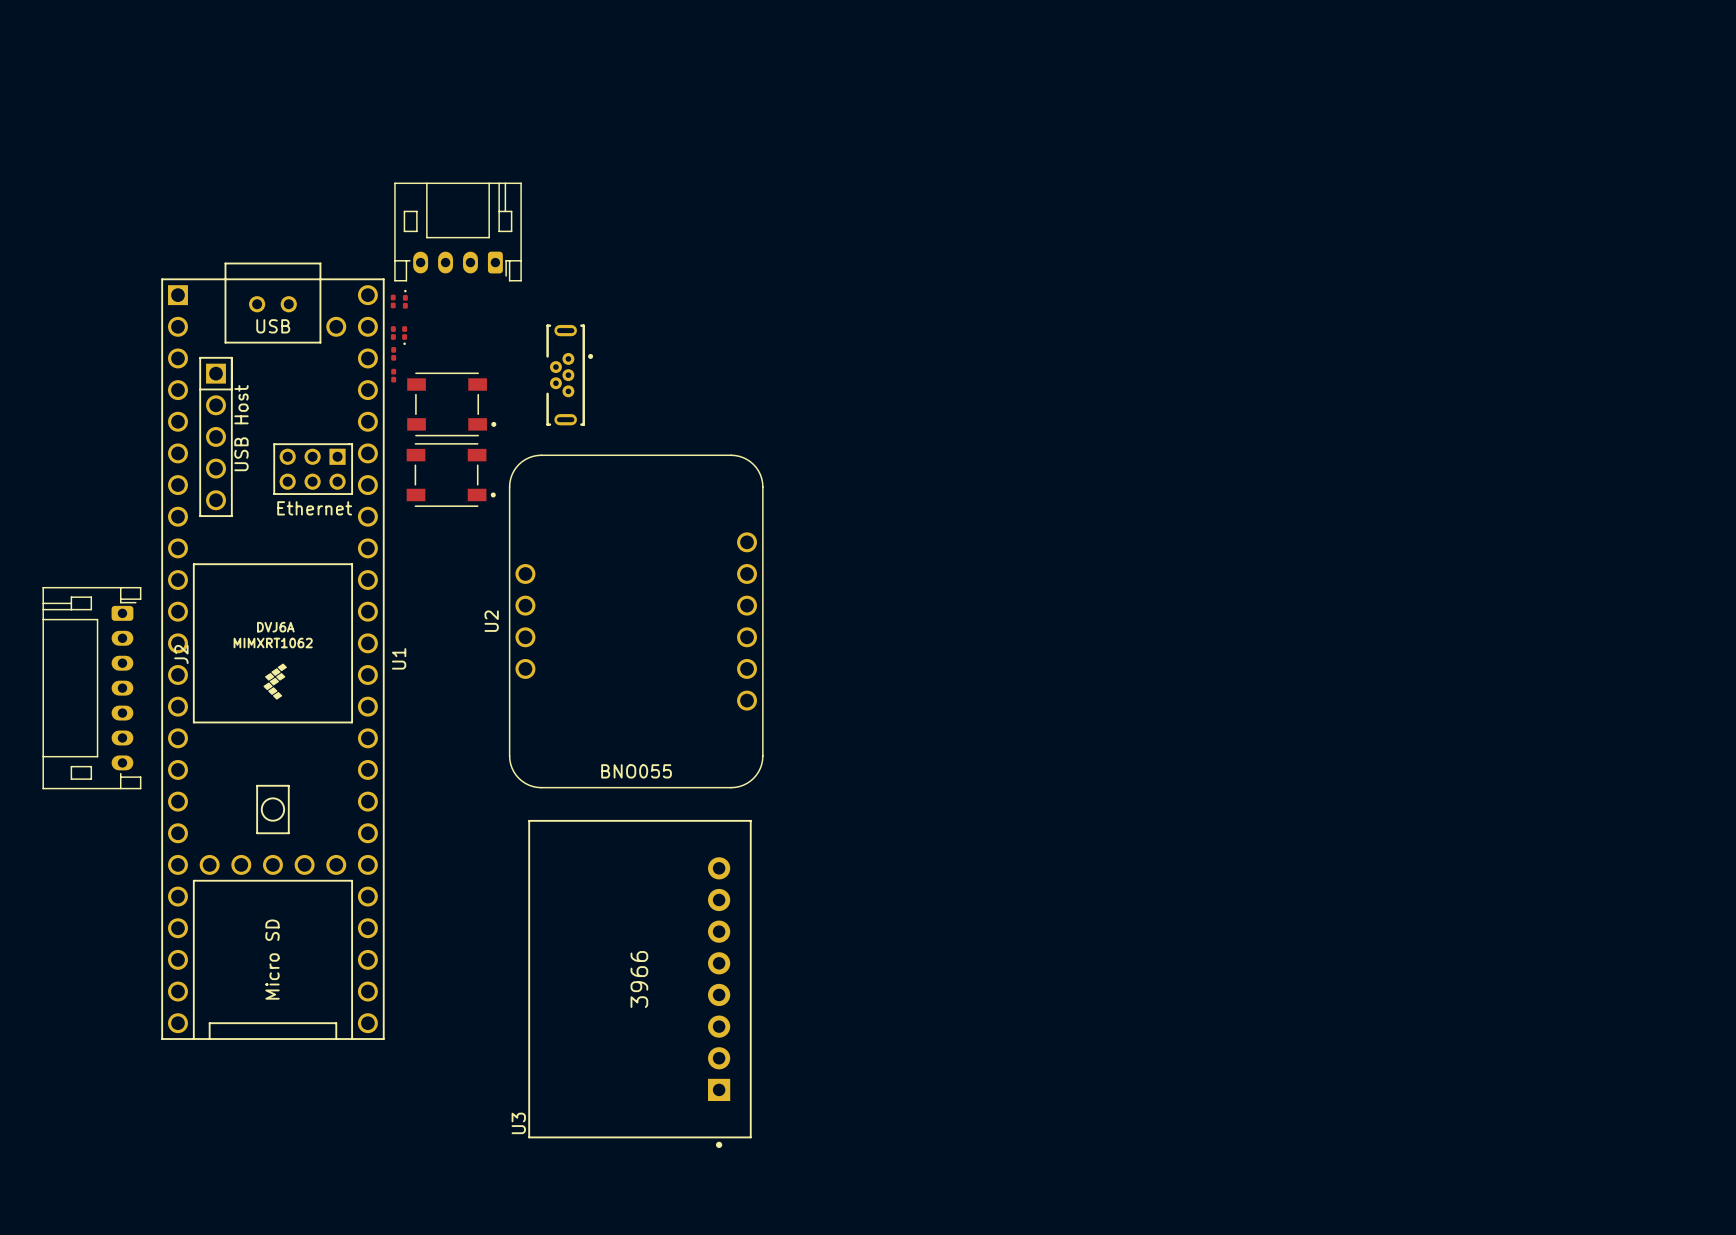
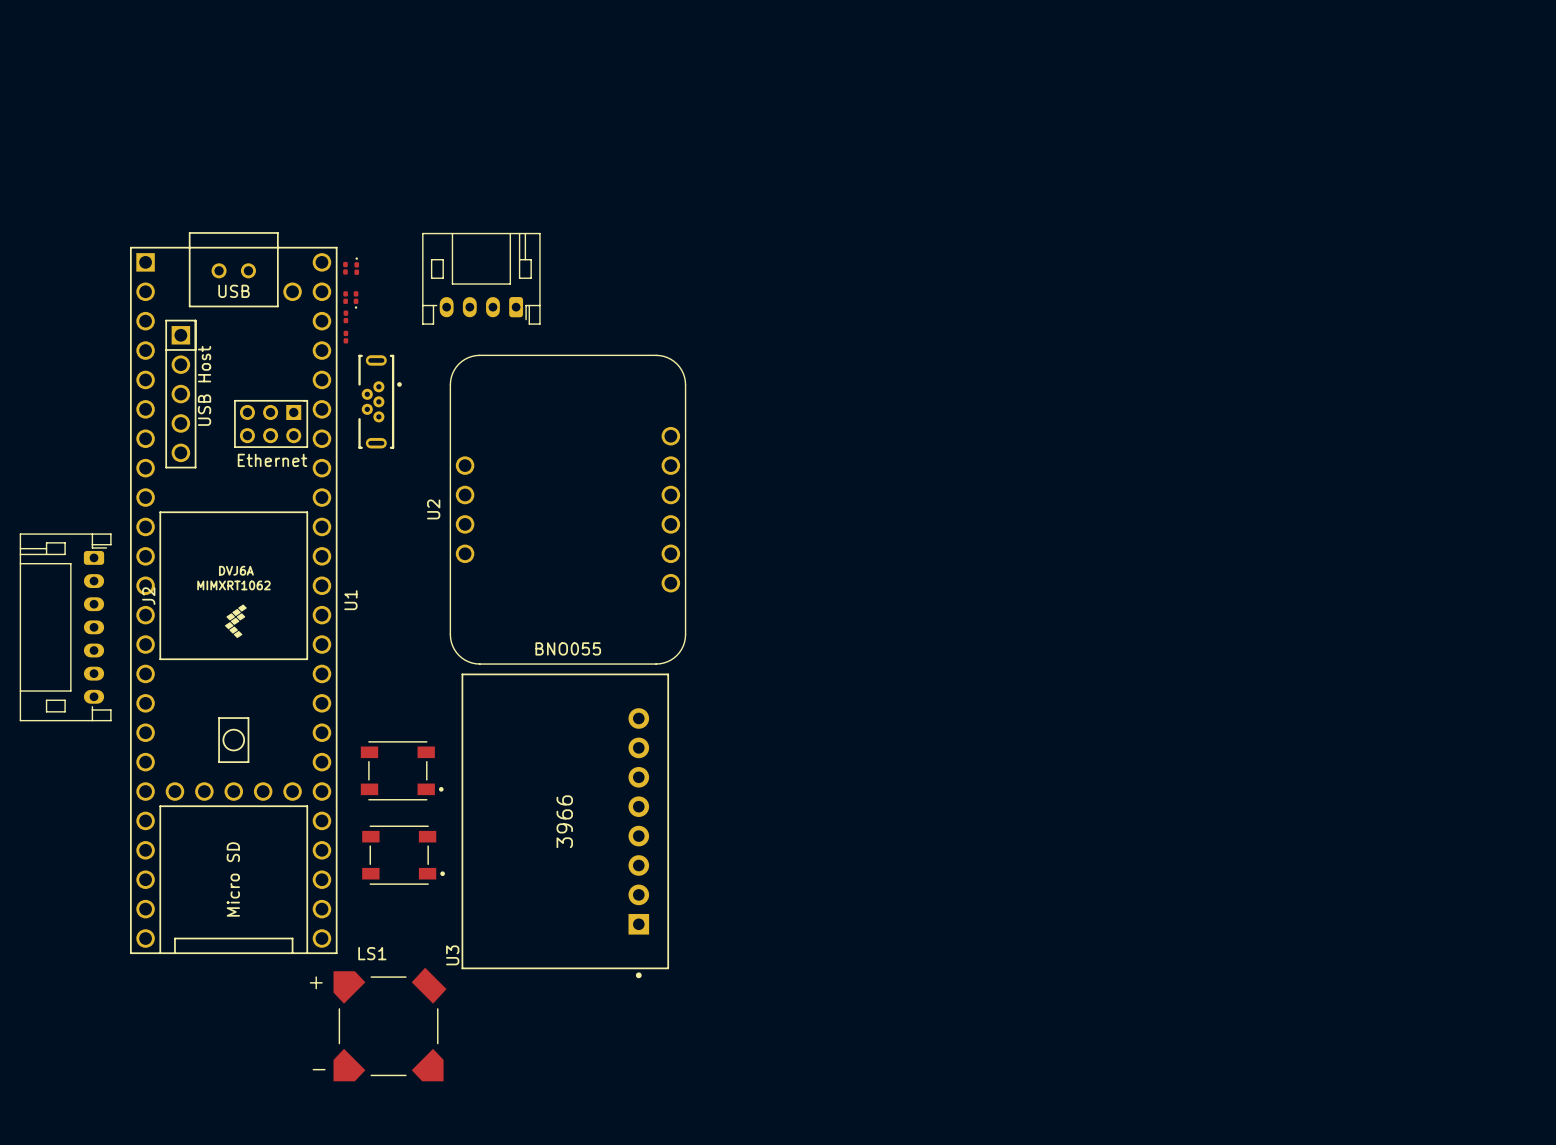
part position: (458, 232) -> (481, 278)
part position: (569, 375) -> (380, 401)
part: (451, 404) -> none
part: (451, 475) -> none
U2 position: (636, 621) -> (567, 509)
part: none -> (402, 770)
part: none -> (403, 855)
U3 position: (639, 983) -> (565, 825)
LS1: none -> (378, 1024)

